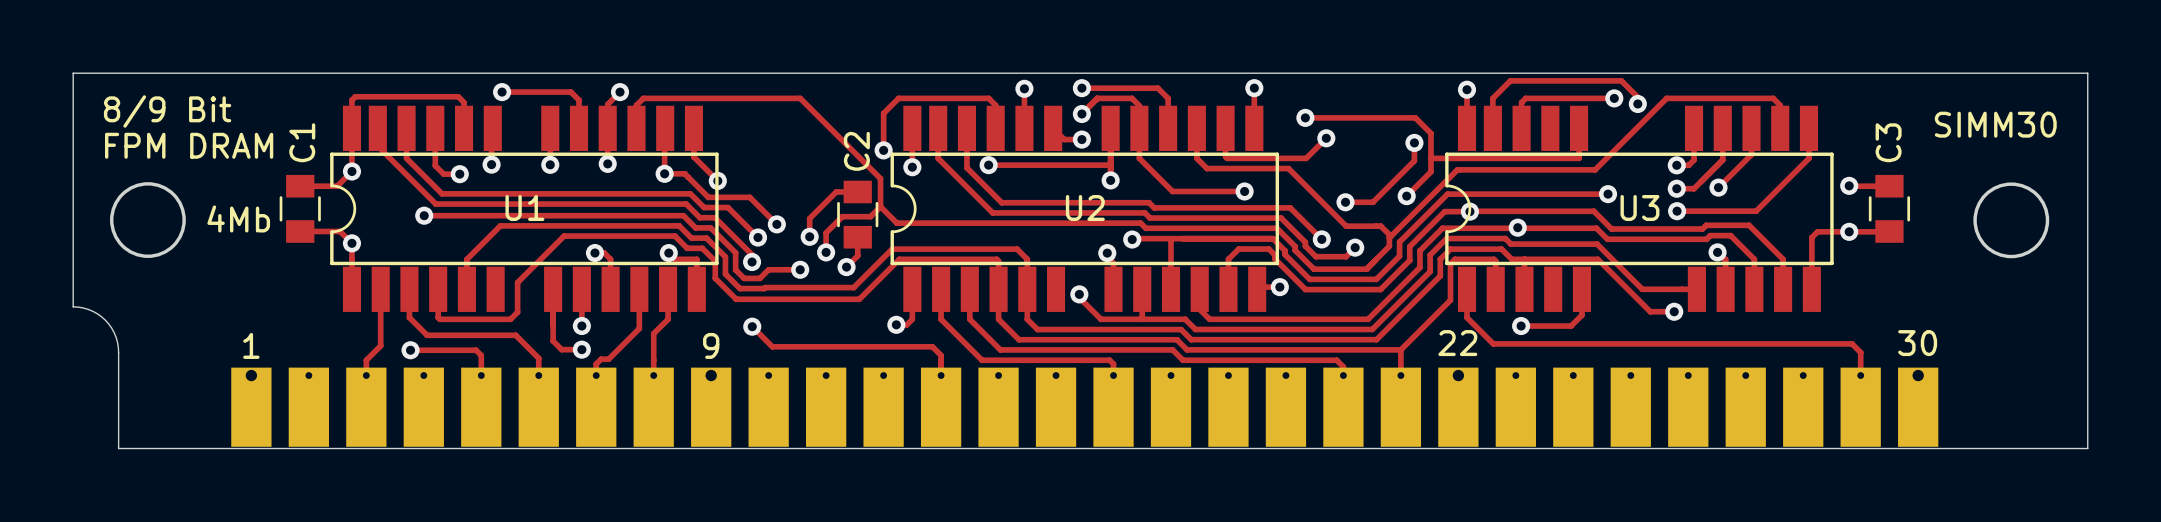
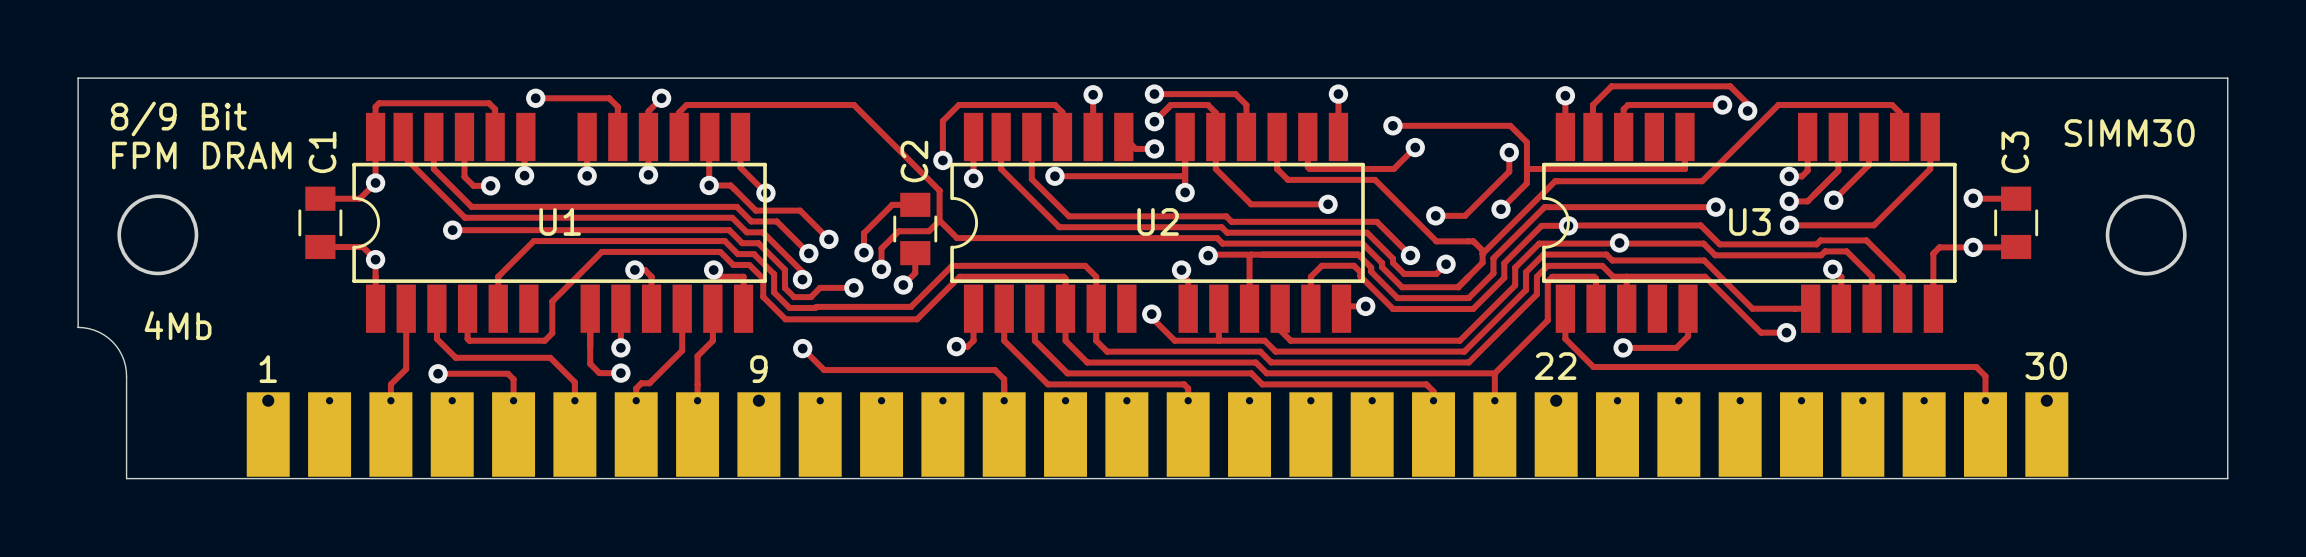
text position: 4Mb (238, 218) -> 4Mb (178, 325)

